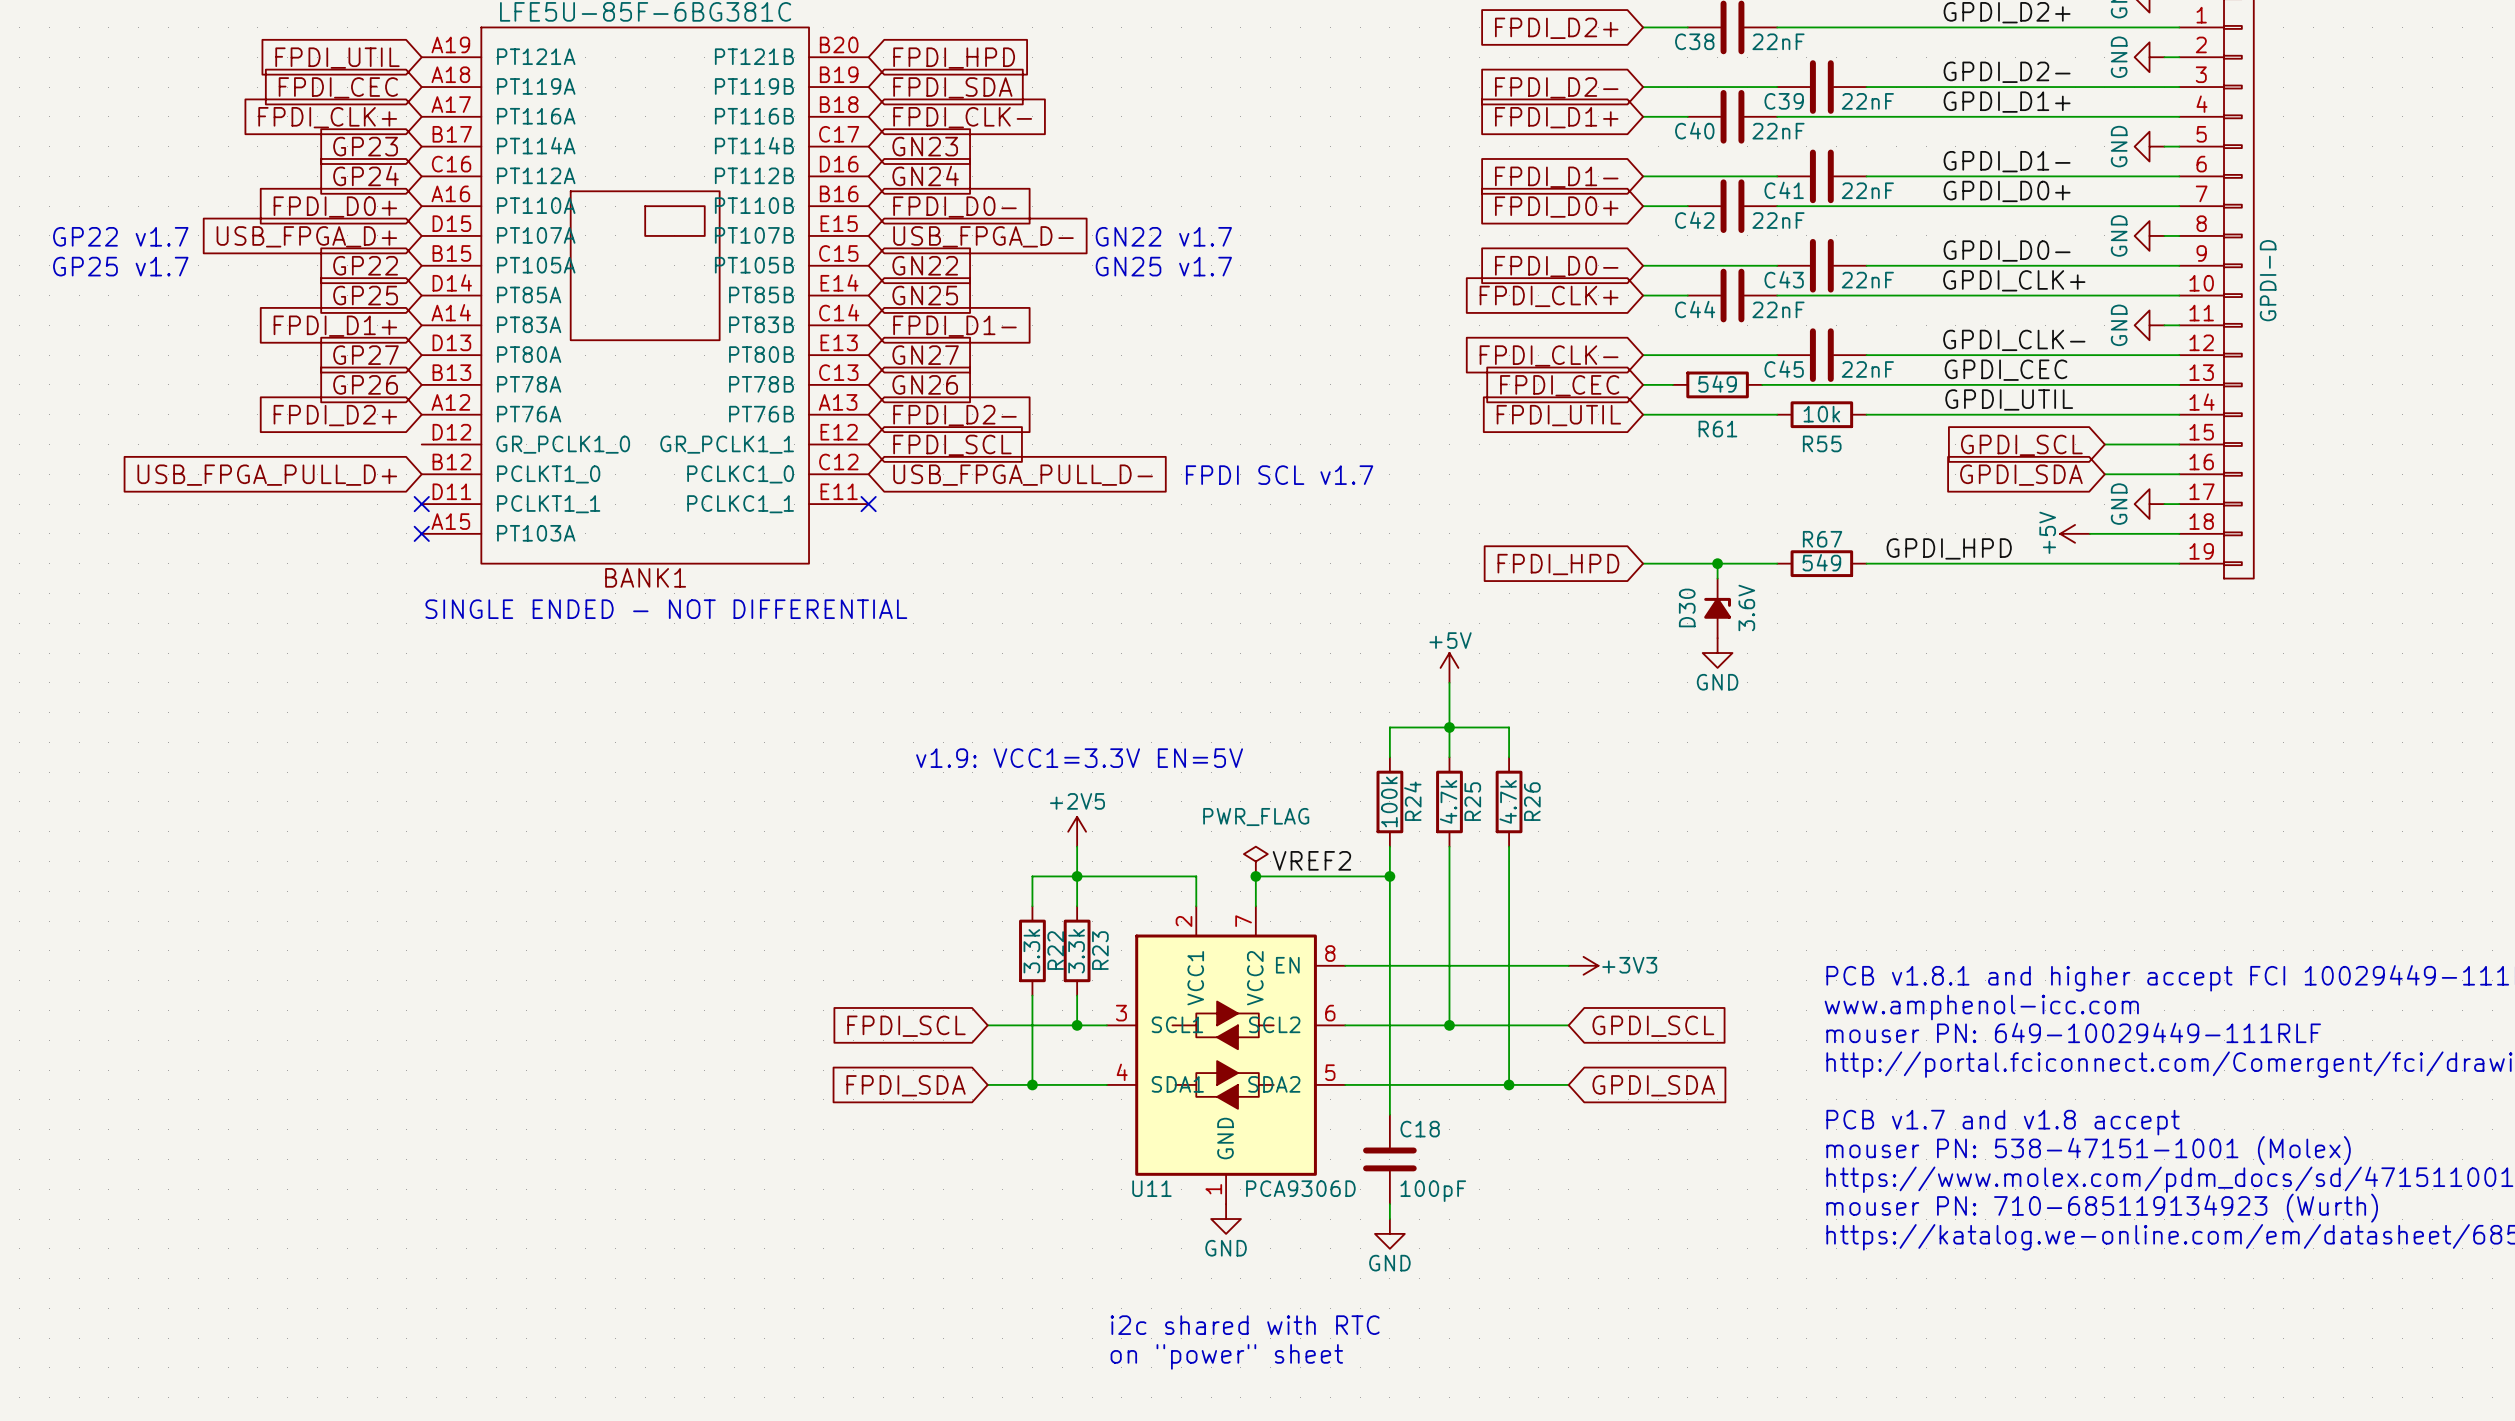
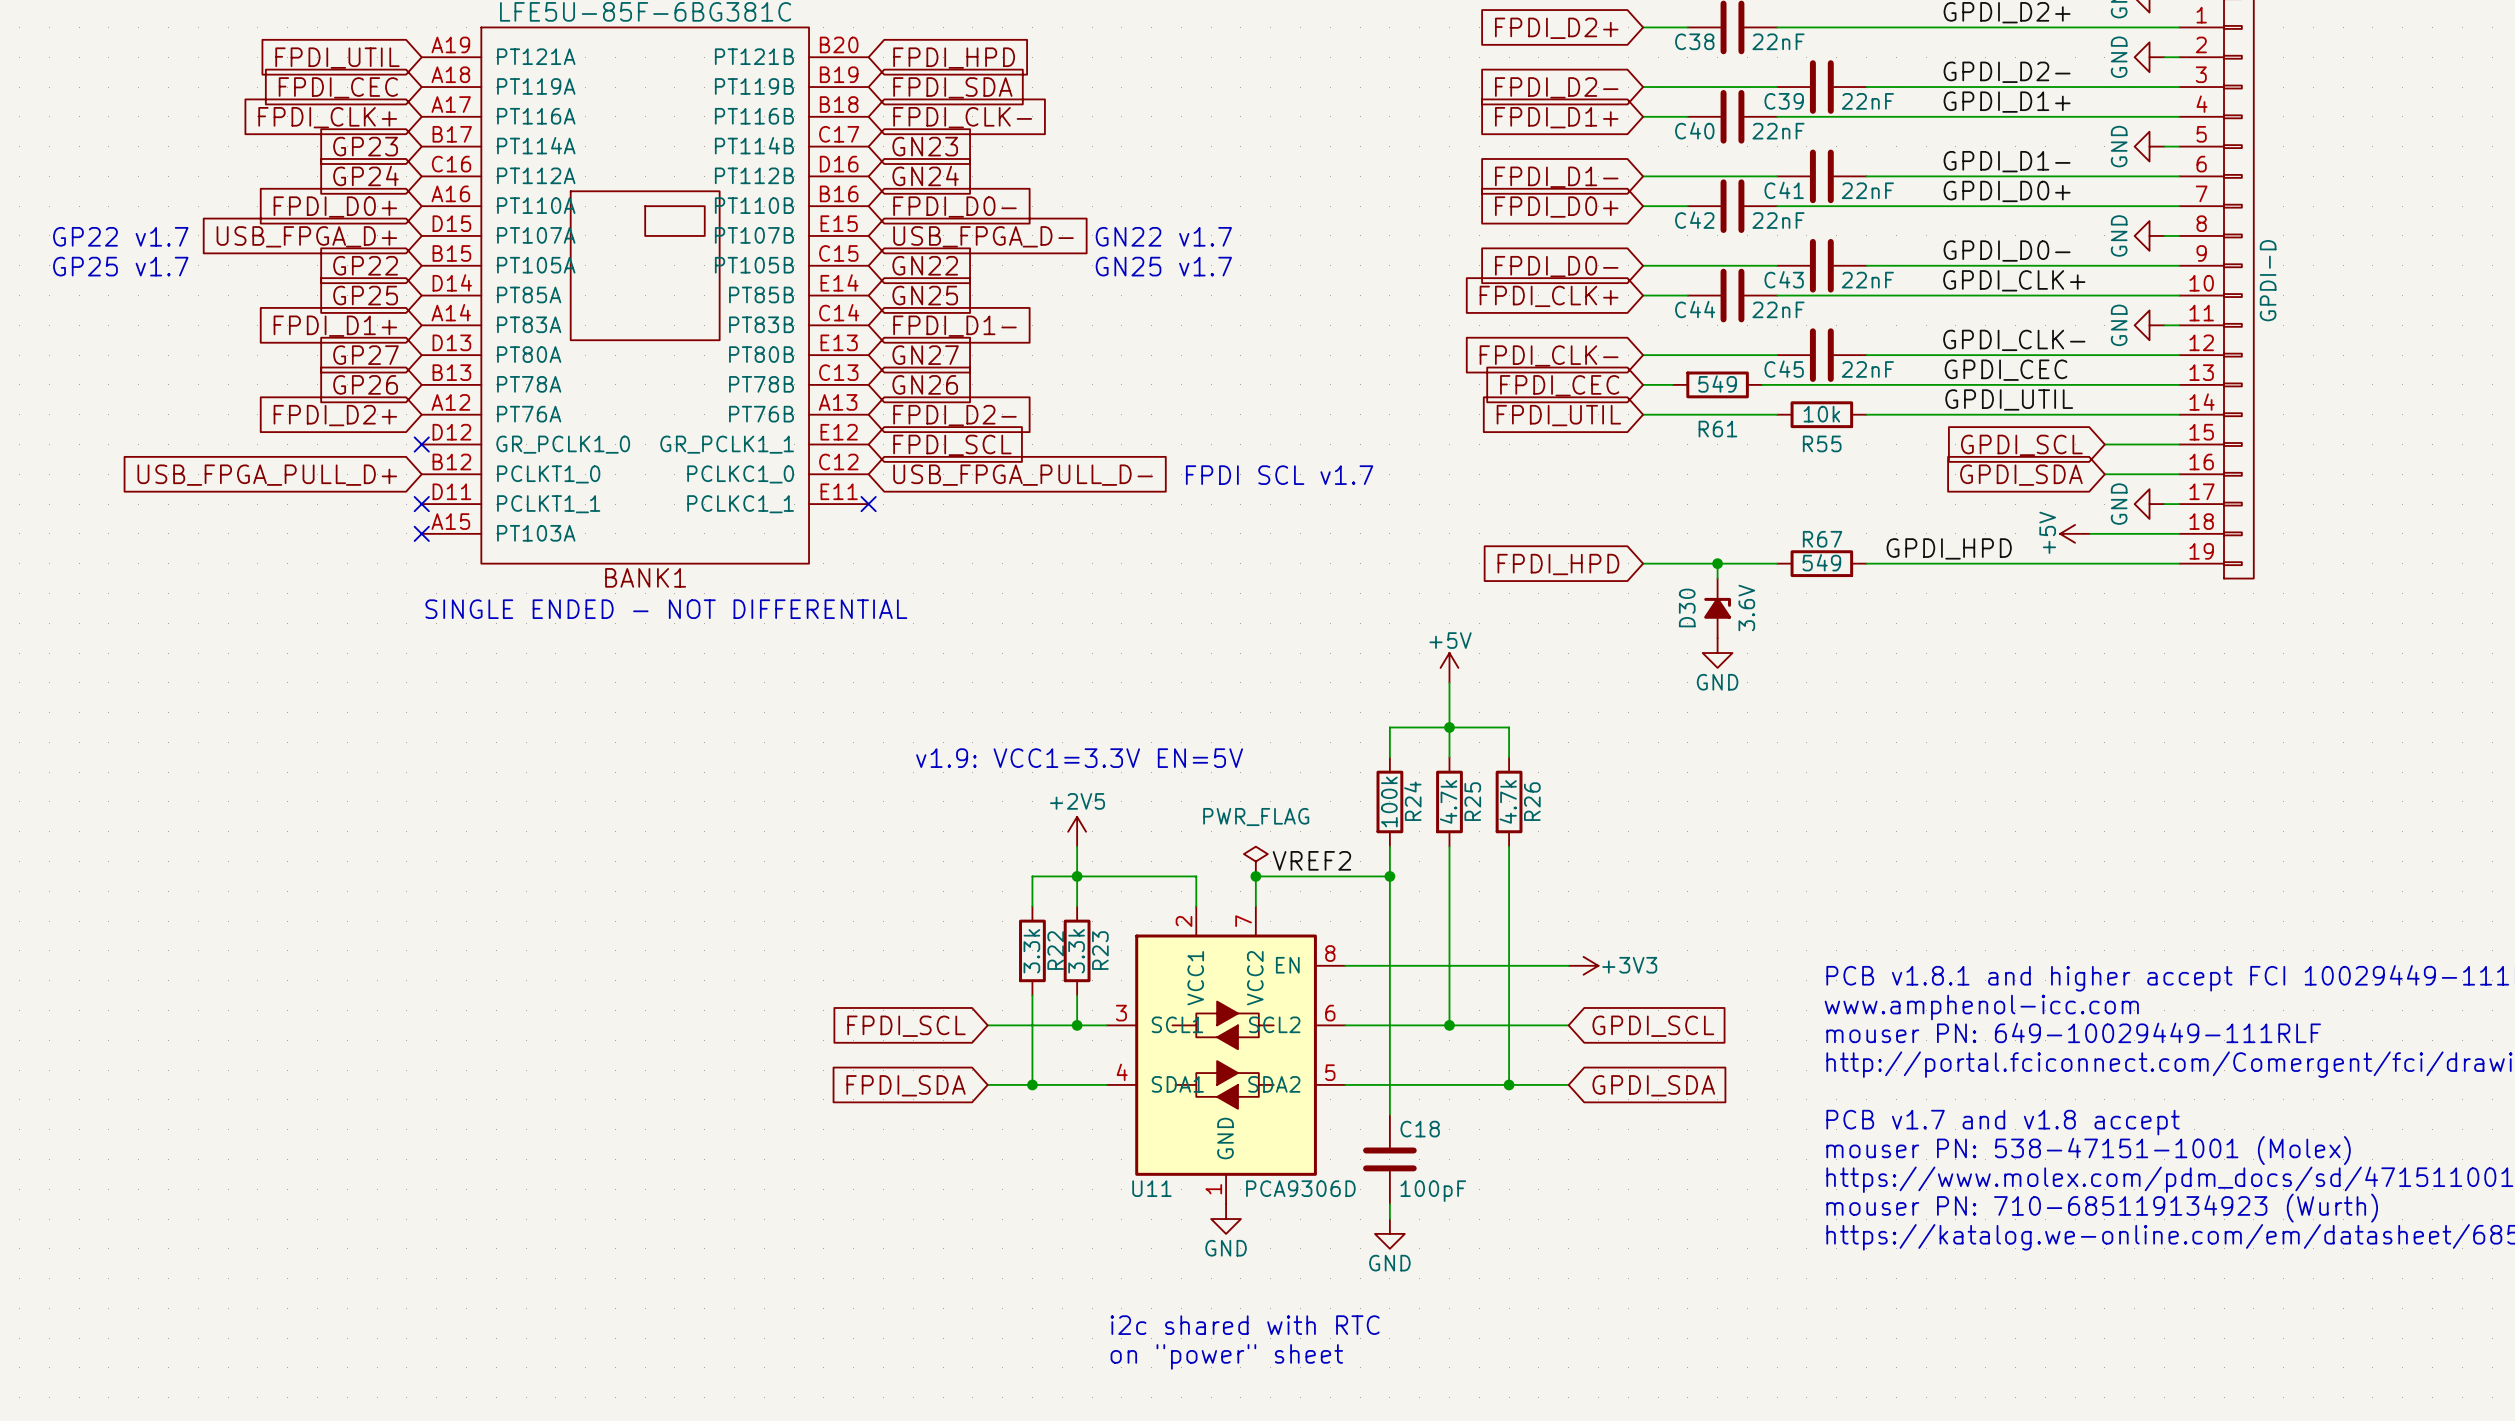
no-connect mark: none -> (421, 444)

